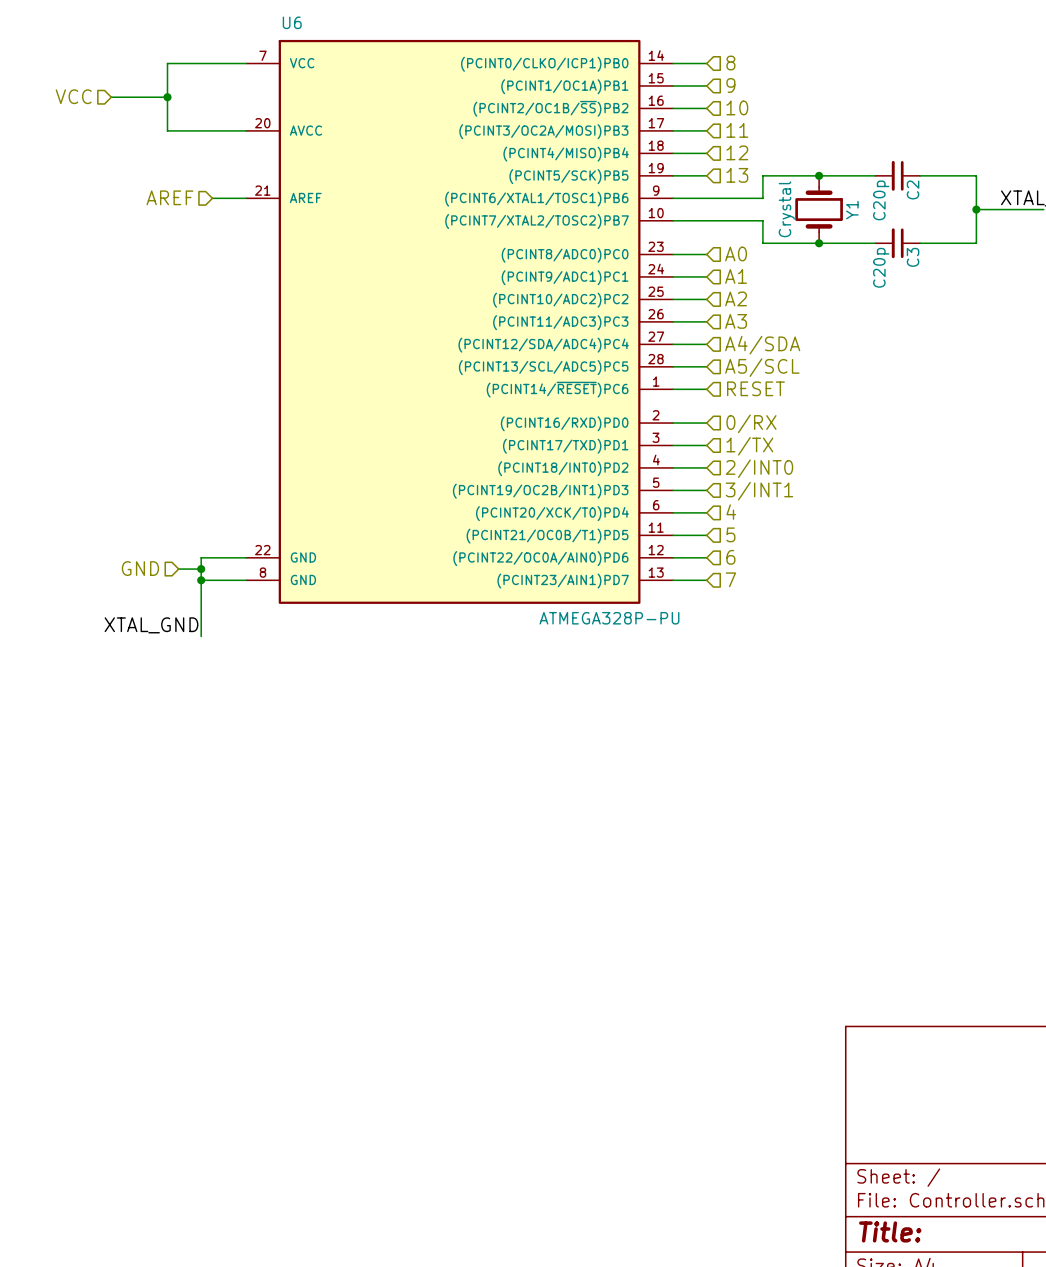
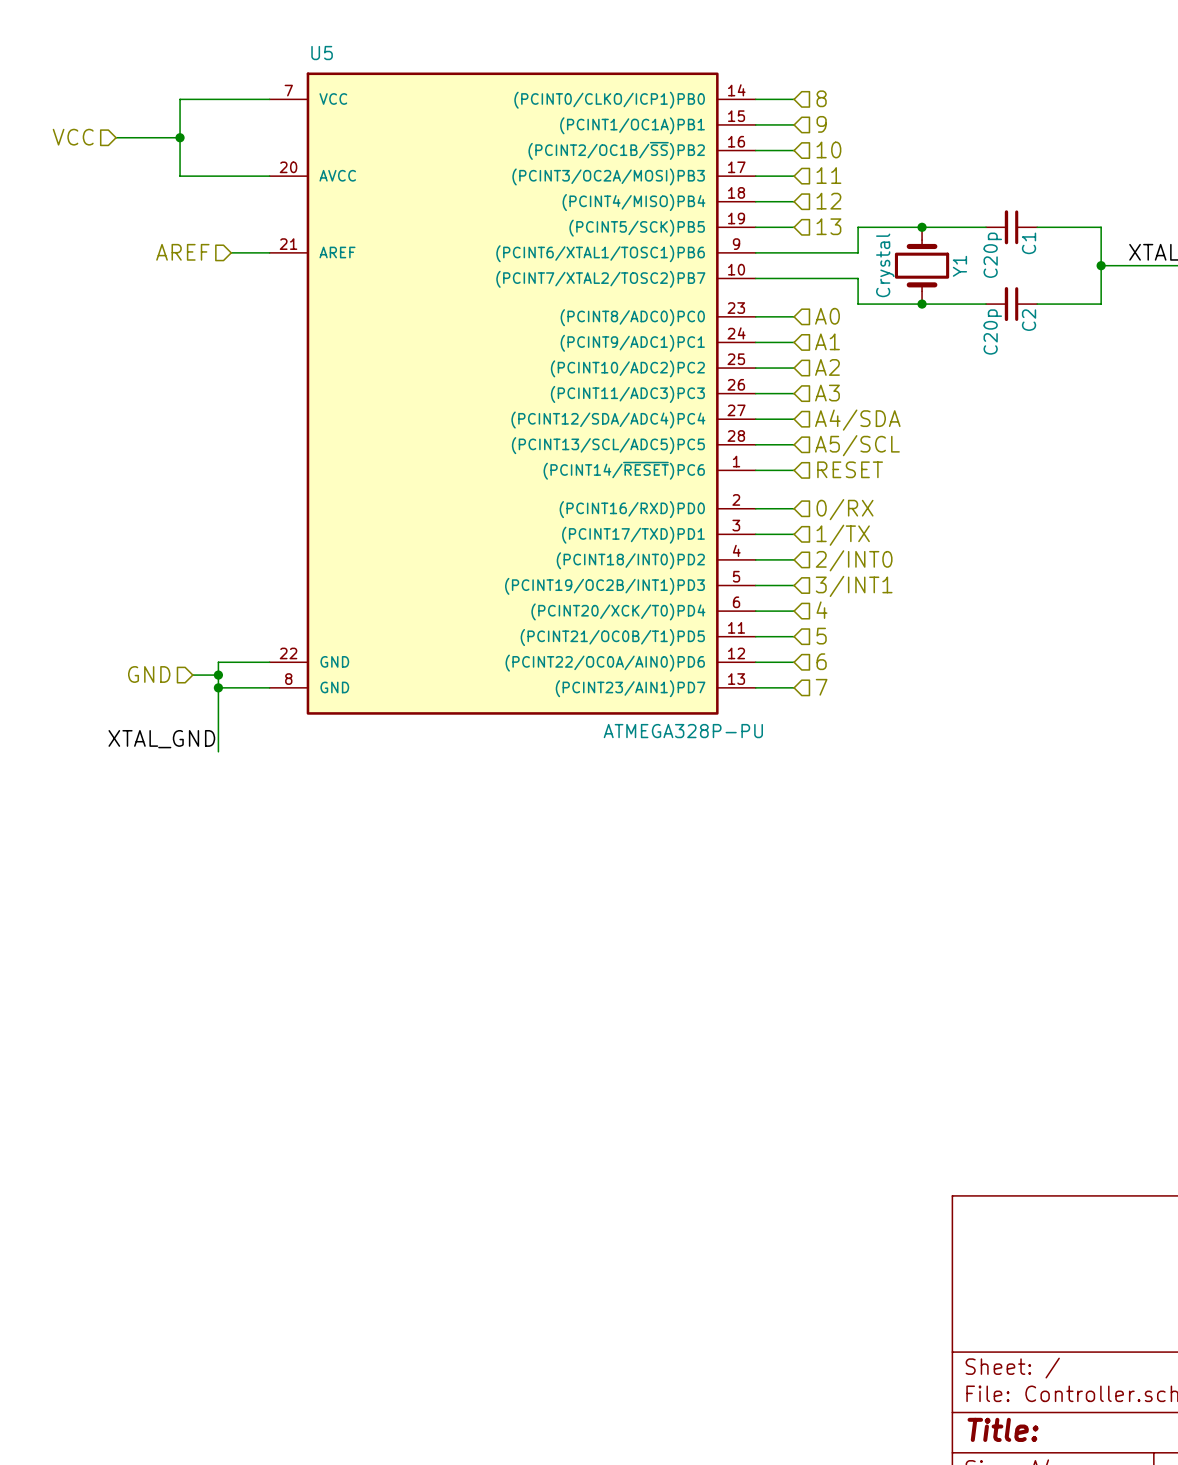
U6 name: U6 (292, 22) -> U5 (322, 53)
C2 name: C2 (913, 189) -> C1 (1029, 243)
C3 name: C3 (913, 257) -> C2 (1029, 320)

